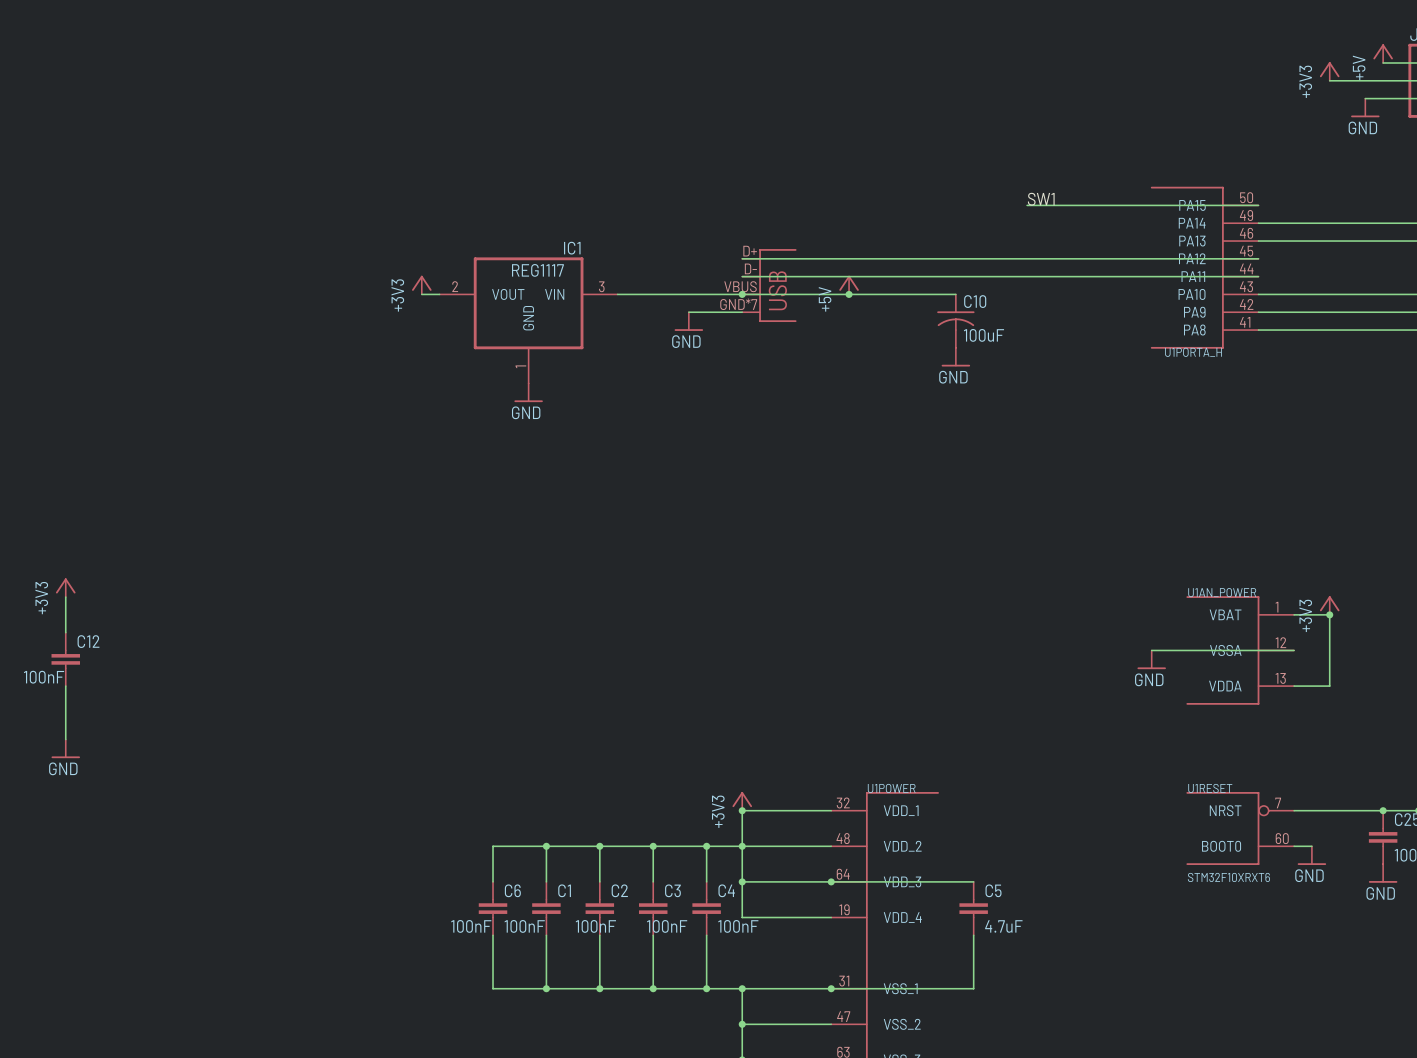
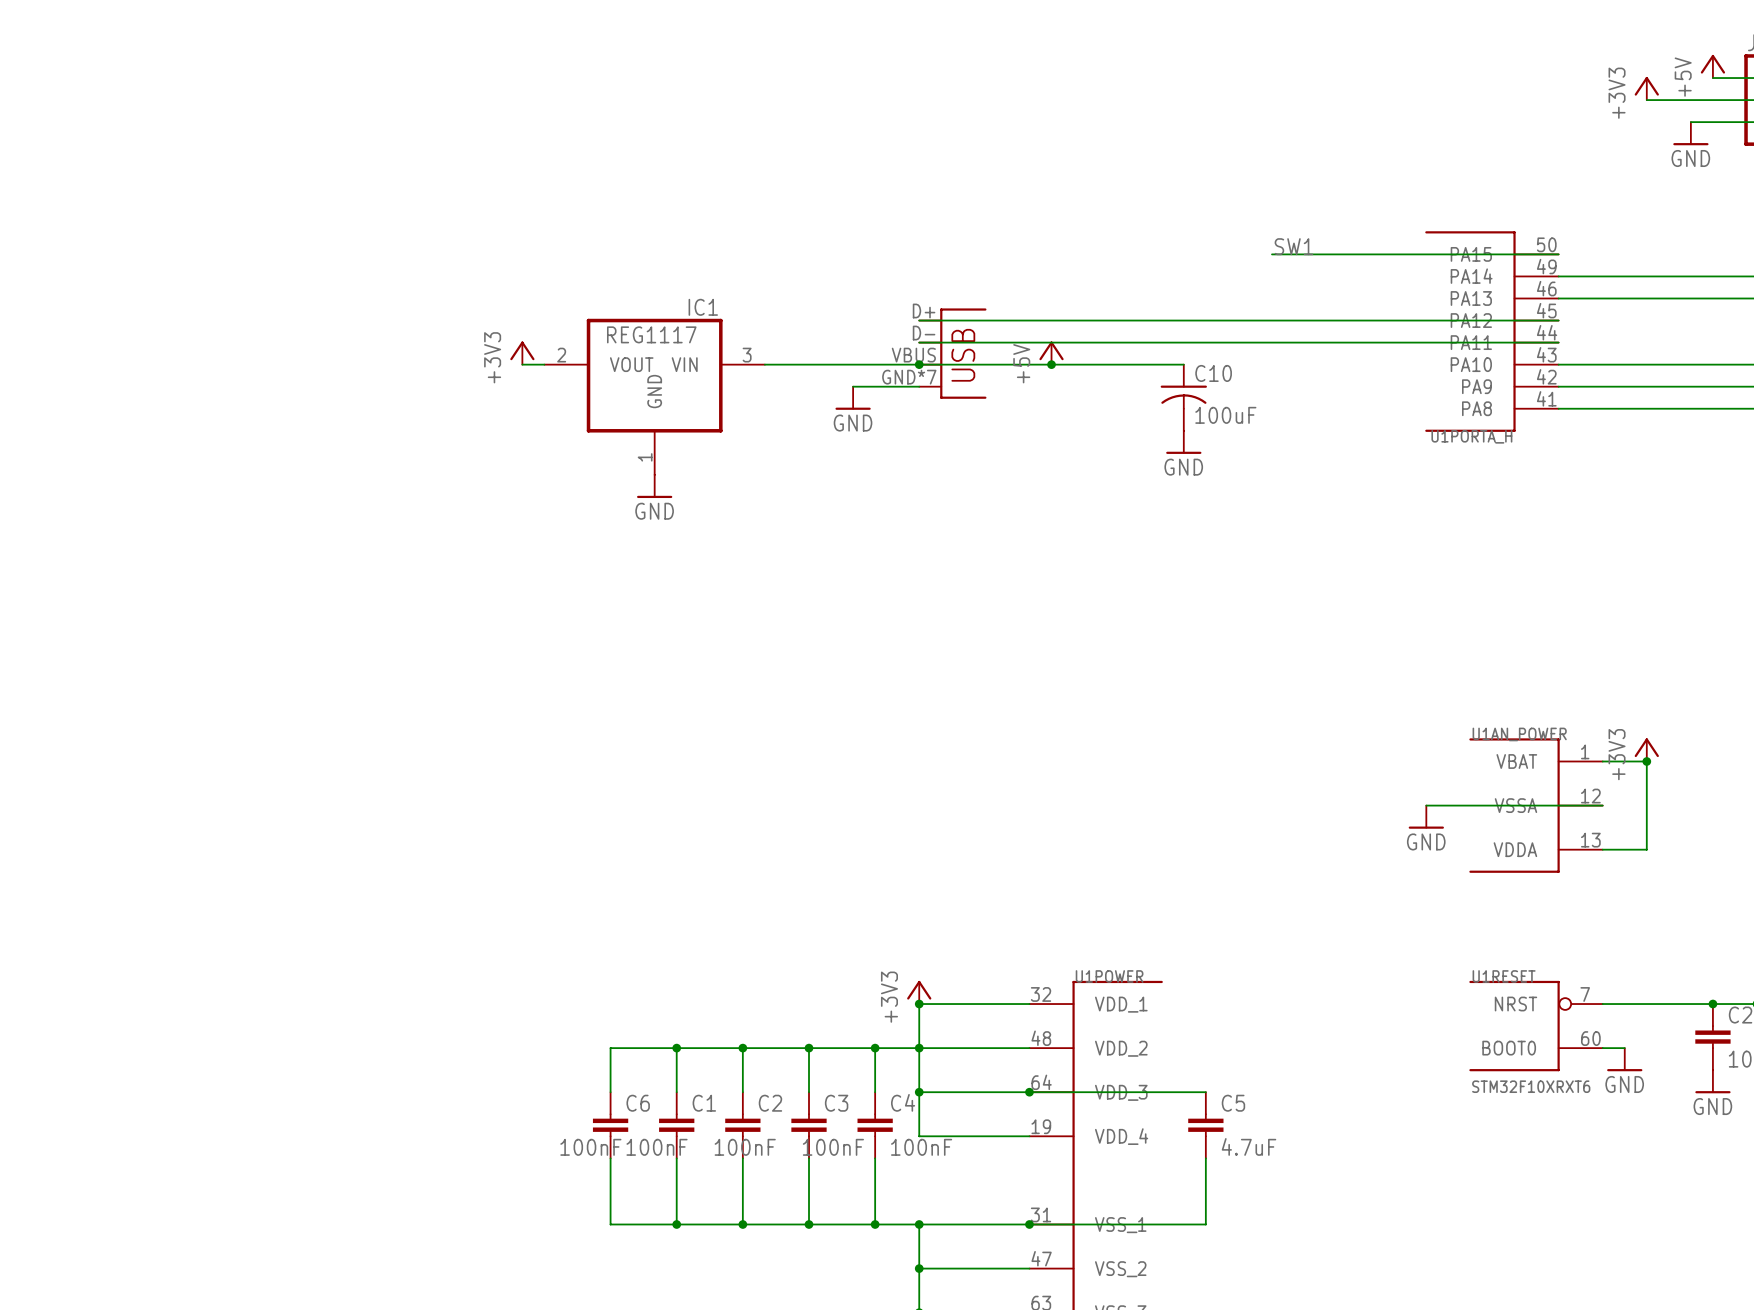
power symbol: +3V3 (65, 587) -> none
wire: (65, 597) (65, 632) -> none
C12: 100nF (65, 659) -> none
wire: (65, 686) (65, 739) -> none
power symbol: GND (65, 748) -> none

